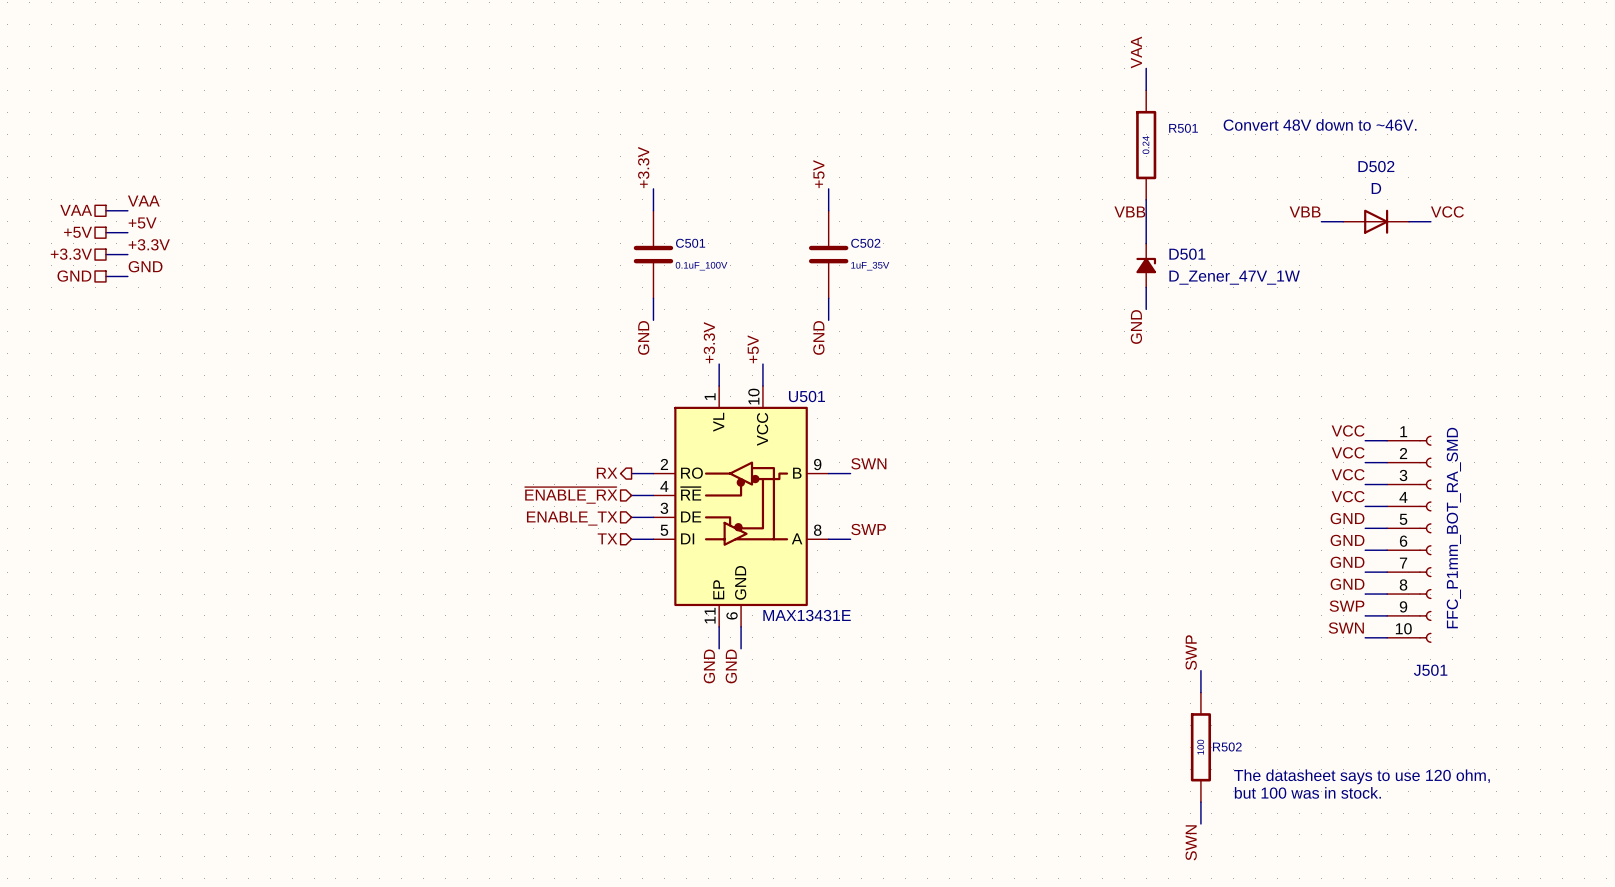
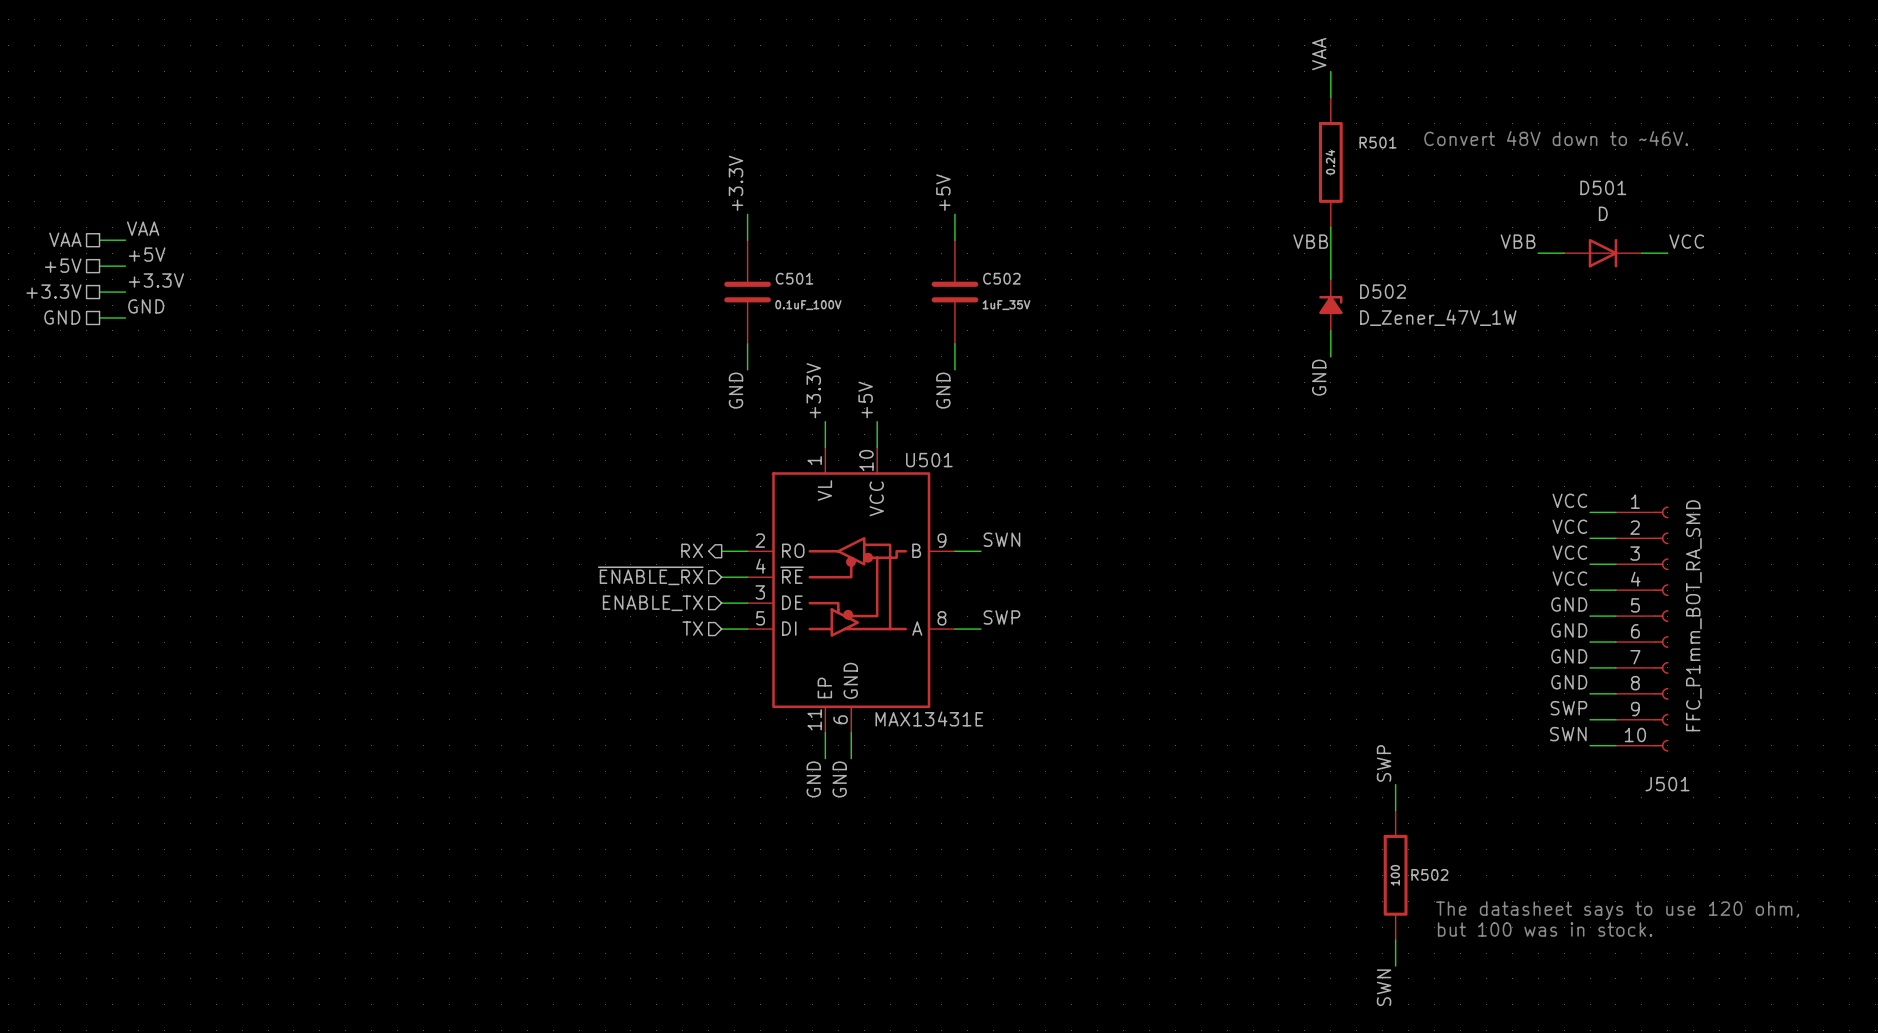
D502 name: D502 (1376, 166) -> D501 (1603, 187)
D501 name: D501 (1187, 254) -> D502 (1383, 291)

